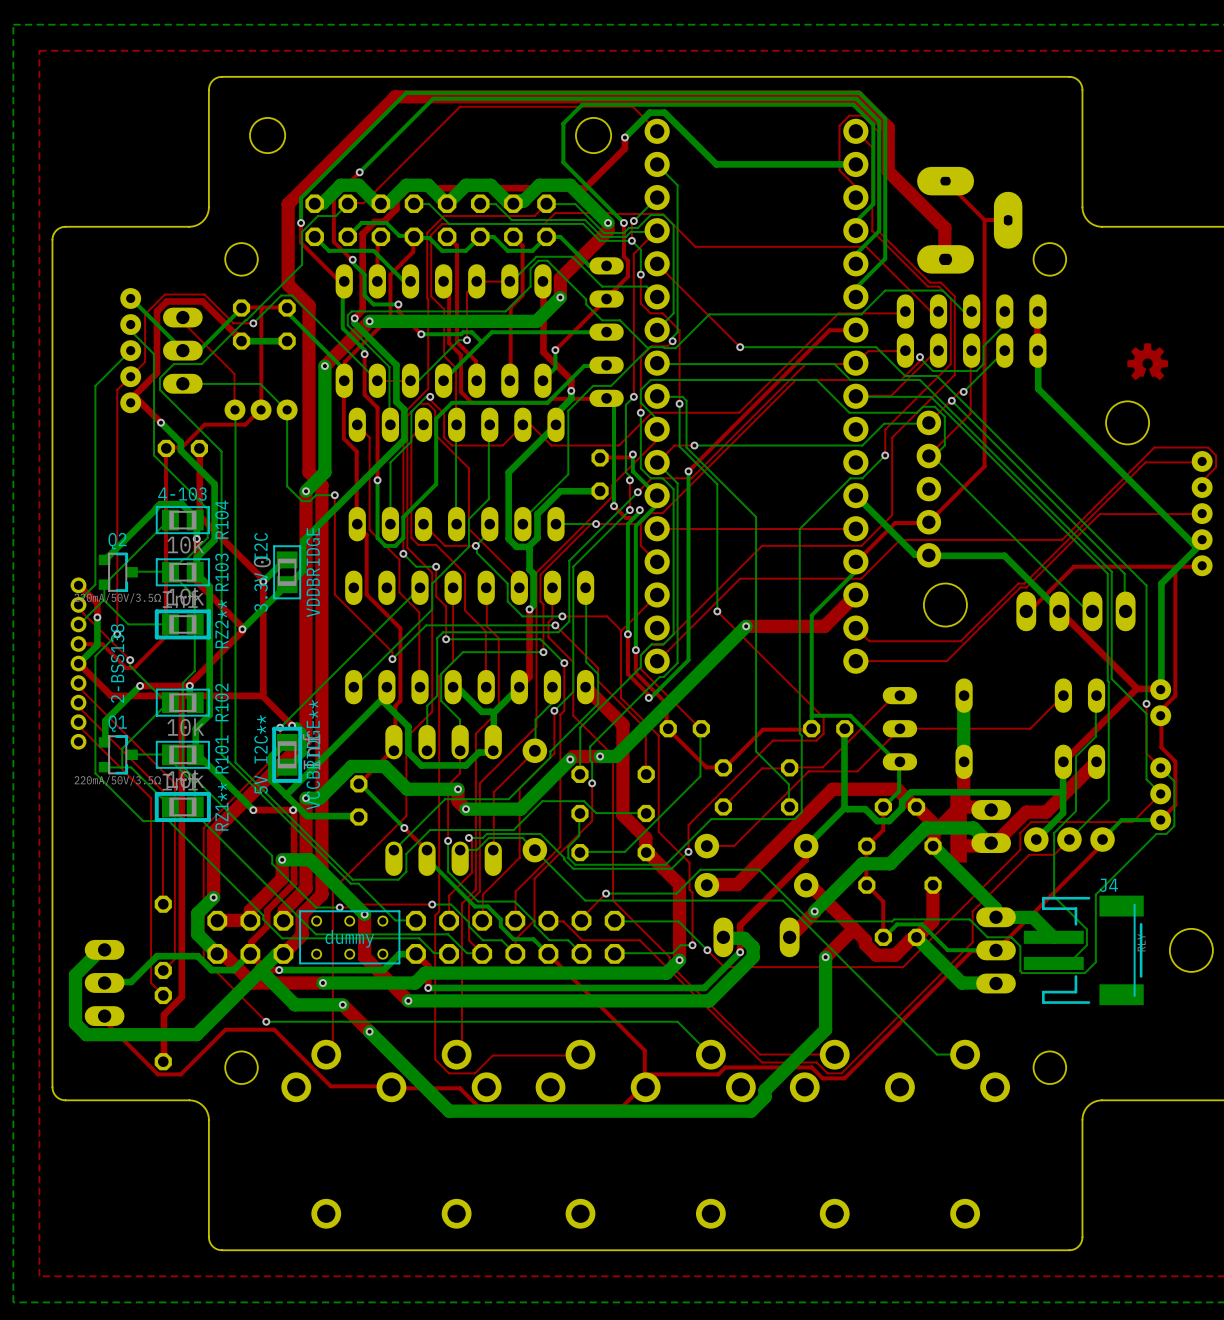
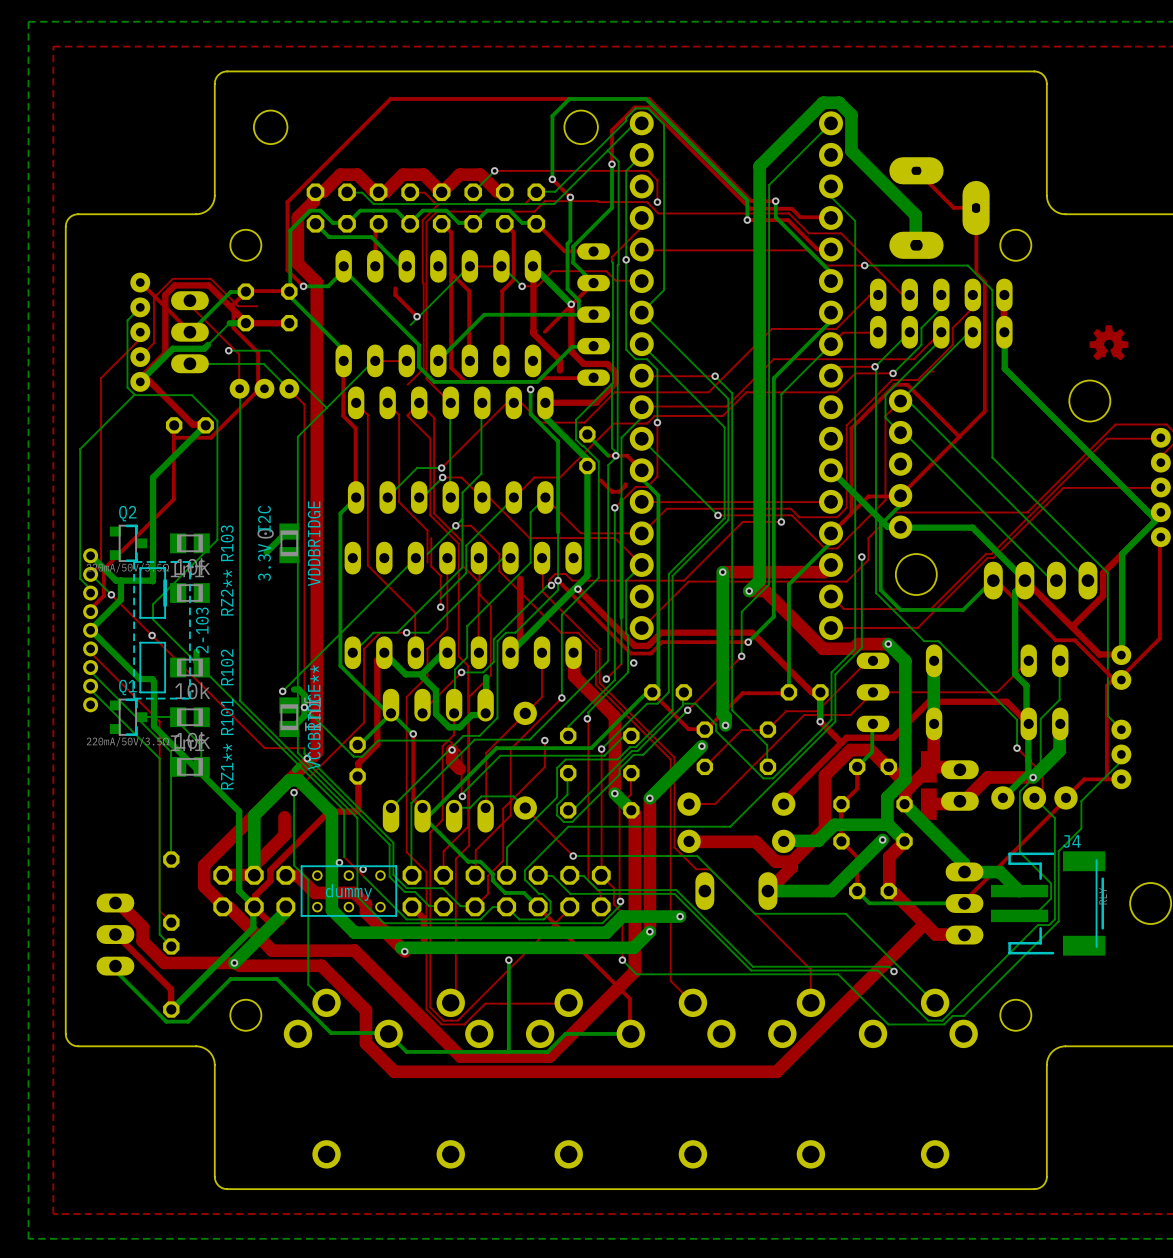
bottom track: (581, 105) (853, 104) (873, 124) (873, 204) (856, 221) (855, 230) -> (569, 98) (646, 98) (747, 200) (747, 220)
top track: (657, 131) (632, 106) (460, 106) (363, 203) (347, 203) -> none
bottom track: none -> (831, 123) (769, 185) (769, 584) (741, 611) (741, 656)
top track: (855, 131) (872, 147) (872, 230) (927, 286) (938, 286) (950, 298) (950, 364) (885, 429) (885, 455) -> none
bottom track: (624, 137) (649, 112) (664, 112) (716, 164) (855, 164) -> none
top track: (624, 137) (624, 148) (585, 188) (408, 188) (396, 200) (396, 209) (383, 221) (374, 221) (362, 233) (362, 310) (354, 318) -> none
via: (624, 137) -> none
bottom track: (563, 162) (623, 222) -> (552, 152) (552, 179)
bottom track: (657, 164) (677, 185) (677, 332) (672, 337) (672, 341) -> (641, 154) (626, 170) (626, 236)
bottom track: (359, 172) (433, 98) (856, 98) (879, 121) (879, 230) (856, 253) (855, 263) -> none
top track: (359, 172) (333, 198) (333, 241) (352, 259) -> none
via: (359, 172) -> none
bottom track: none -> (612, 164) (612, 207) (573, 246) (573, 262) (593, 283)
top track: none -> (612, 164) (612, 130) (634, 107) (648, 107) (750, 208) (791, 208) (800, 217) (831, 217)
via: none -> (612, 164)
top track: none -> (494, 170) (647, 170) (657, 180) (657, 202)
via: none -> (494, 170)
top track: none -> (552, 179) (570, 197)
via: none -> (552, 179)
bottom track: (657, 197) (633, 221) -> none
top track: (855, 197) (855, 186) (839, 170) (839, 125) (849, 115) (862, 115) (878, 131) (878, 230) (929, 282) (940, 282) (954, 296) (954, 374) (892, 437) (892, 515) (872, 534) -> (972, 294) (972, 308) (952, 327) (952, 345) (917, 380) (892, 380) (846, 425) (846, 507)
bottom track: (314, 203) (322, 203) (340, 185) (358, 185) (374, 201) (380, 203) (388, 203) (406, 185) (428, 185) (447, 203) (465, 185) (490, 185) (508, 203) (513, 203) (523, 201) (539, 185) (570, 185) (608, 222) -> none
bottom track: (347, 203) (335, 216) (317, 216) (302, 231) (302, 264) (224, 341) -> (347, 192) (362, 192) (373, 204) (554, 204) (634, 123) (641, 123)
bottom track: (414, 203) (429, 204) (449, 223) (583, 223) (600, 240) (631, 240) (640, 249) -> none
top track: none -> (410, 192) (424, 192) (435, 204) (438, 204)
bottom track: (480, 203) (495, 204) (511, 220) (585, 220) (602, 236) (625, 236) (630, 231) (657, 230) -> (473, 192) (494, 170)
top track: none -> (504, 192) (497, 191) (480, 174) (459, 174) (441, 192) (423, 174) (402, 174) (385, 191) (378, 192) (372, 189) (357, 174) (340, 174) (323, 191) (315, 191) (313, 201) (297, 217) (297, 263) (316, 282) (316, 752) (204, 865) (204, 886) (222, 906)
bottom track: (546, 203) (575, 204) (604, 232) (623, 232) (628, 227) (637, 227) (650, 215) (663, 215) (673, 224) (673, 313) -> (536, 192) (555, 191) (626, 120) (626, 117) (635, 108) (647, 108) (664, 124) (664, 290) (657, 296)
bottom track: none -> (570, 197) (567, 289) (578, 300) (578, 313) (593, 314)
via: none -> (570, 197)
top track: none -> (775, 201) (751, 201) (648, 98) (390, 98) (287, 202) (287, 270) (303, 286)
via: none -> (775, 201)
via: none -> (657, 202)
top track: (984, 220) (984, 466) -> (976, 208) (976, 273) (984, 281) (984, 411) (953, 442)
top track: (633, 221) (631, 222) (631, 240) -> none
via: (633, 221) -> none
bottom track: (301, 222) (301, 198) (406, 92) (859, 92) (885, 118) (885, 258) (856, 287) (855, 296) -> (775, 201) (775, 217) (830, 272) (831, 281)
top track: (301, 222) (301, 242) (338, 280) (344, 281) -> none
via: (301, 222) -> none
bottom track: (386, 222) (399, 235) (429, 237) (442, 250) (465, 250) (480, 236) (493, 236) (507, 250) (532, 250) (546, 236) (560, 236) (589, 265) (606, 265) -> (383, 210) (396, 210) (410, 223) (422, 210) (446, 210) (458, 222) (473, 223) (487, 210) (509, 210) (522, 222) (536, 223)
top track: (608, 222) (608, 230) (560, 278) (560, 297) -> none
via: (608, 222) -> none
top track: (623, 222) (623, 256) (627, 260) (627, 276) (606, 299) -> none
via: (623, 222) -> none
top track: (674, 225) (695, 246) (832, 246) -> (658, 213) (788, 213) (808, 233)
top track: (656, 230) (633, 253) (633, 396) -> (641, 218) (641, 227) (612, 257) (612, 261)
top track: none -> (747, 220) (788, 220) (817, 249) (831, 249)
via: none -> (747, 220)
bottom track: none -> (347, 223) (332, 222) (320, 210) (310, 210) (290, 230) (289, 291)
top track: (414, 236) (413, 251) (390, 274) (390, 316) (344, 362) (344, 380) -> none
top track: none -> (536, 223) (564, 251) (593, 251)
via: (631, 240) -> none
bottom track: (352, 259) (352, 262) (364, 274) (364, 295) (373, 304) (398, 304) -> none
via: (352, 259) -> none
bottom track: none -> (916, 245) (915, 215) (851, 151) (851, 115) (839, 102) (823, 102) (759, 166) (759, 580) (749, 591)
top track: (945, 259) (944, 227) (888, 171) (888, 127) (857, 96) (395, 96) (288, 204) (288, 284) (309, 305) (309, 472) (321, 485) (321, 894) (302, 914) (302, 935) (283, 953) -> none
top track: (657, 264) (740, 347) -> (642, 250) (810, 250) (825, 265) (864, 265)
bottom track: none -> (626, 259) (626, 349) (635, 359) (647, 359) (657, 369) (657, 422)
top track: (640, 274) (640, 303) (650, 313) (662, 313) (679, 330) (679, 403) -> none
via: none -> (864, 265)
bottom track: (344, 281) (342, 328) (364, 350) (364, 354) -> none
top track: (444, 281) (449, 286) (449, 343) (461, 355) (461, 391) -> none
bottom track: none -> (469, 266) (410, 325)
top track: (476, 281) (466, 292) (466, 340) -> none
bottom track: (509, 281) (536, 256) (572, 256) (602, 286) (646, 286) (657, 296) -> (501, 266) (522, 286)
bottom track: none -> (532, 266) (571, 304)
top track: none -> (451, 273) (469, 291) (469, 342)
top track: (431, 296) (444, 309) (444, 356) (456, 368) (456, 424) -> (426, 280) (426, 379) (450, 402)
top track: none -> (641, 281) (615, 280) (606, 271) (552, 271) (537, 286) (522, 286)
bottom track: (560, 297) (536, 321) (369, 321) -> none
via: (560, 297) -> none
bottom track: (130, 298) (182, 350) (199, 350) (241, 308) -> (189, 332) (230, 292) (245, 292)
top track: none -> (140, 282) (189, 332)
via: none -> (303, 286)
via: none -> (522, 286)
via: (398, 304) -> none
top track: (261, 307) (261, 409) (245, 424) (204, 424) (181, 447) (166, 448) -> none
top track: none -> (245, 291) (233, 304) (233, 327) (258, 352) (258, 388) (264, 388) (259, 389) (210, 437) (173, 437)
bottom track: (971, 311) (963, 311) (942, 290) (885, 290) (861, 314) (709, 314) (675, 348) (649, 347) (611, 385) (593, 385) (568, 410) (568, 474) (523, 519) (522, 524) -> (941, 294) (940, 309) (921, 327) (921, 345) (893, 373)
bottom track: (1004, 311) (1004, 325) (983, 346) (983, 364) (976, 371) (932, 371) (920, 357) -> none
top track: (905, 312) (838, 313) (739, 412) (651, 412) (618, 445) (597, 445) -> (877, 295) (869, 295) (836, 328) (771, 328) (708, 392) (614, 392) (584, 422)
bottom track: (354, 318) (354, 323) (396, 365) (396, 401) (404, 409) (404, 439) (303, 540) (303, 570) (242, 629) -> none
via: (354, 318) -> none
top track: (369, 321) (324, 366) -> none
via: (369, 321) -> none
top track: none -> (571, 304) (571, 351) (583, 363) (607, 363) (615, 372) (615, 382) (595, 402) (545, 402)
via: none -> (571, 304)
bottom track: (253, 323) (281, 295) (292, 295) (376, 379) -> none
via: (253, 323) -> none
bottom track: (130, 324) (131, 331) (154, 354) (154, 455) (207, 509) (207, 537) (170, 572) -> (140, 307) (127, 320) (127, 387) (135, 395) (191, 395) (217, 420) (217, 539) (153, 604) (153, 619) (344, 810) (344, 856)
bottom track: none -> (641, 312) (728, 398) (728, 520) (672, 575) (672, 710) (635, 747) (629, 747) (617, 759) (565, 759) (557, 768) (557, 797) (506, 847) (506, 875)
bottom track: none -> (831, 312) (830, 321) (773, 378) (773, 616) (748, 642)
top track: (855, 330) (829, 330) (688, 471) -> none
bottom track: (421, 334) (461, 334) (463, 332) (471, 332) (481, 342) -> none
bottom track: (466, 340) (459, 340) (419, 379) (410, 380) -> none
via: (466, 340) -> none
bottom track: (287, 341) (241, 341) -> (229, 323) (245, 323)
top track: none -> (289, 323) (245, 323)
top track: (672, 341) (667, 346) (651, 346) (640, 357) (640, 412) -> none
via: (672, 341) -> none
top track: (457, 342) (475, 361) -> (451, 324) (451, 367) (454, 371)
bottom track: (740, 347) (876, 347) (905, 375) (936, 375) (1146, 585) (1146, 603) -> (864, 265) (967, 265) (992, 290) (992, 457) (1107, 573)
via: (740, 347) -> none
bottom track: (648, 348) (619, 320) (602, 320) (586, 304) (586, 299) (547, 260) (538, 260) (530, 268) (530, 286) (505, 311) (351, 311) (347, 315) (347, 325) (389, 367) (390, 424) -> none
bottom track: (130, 350) (95, 385) (95, 584) (79, 600) (78, 604) -> (111, 594) (90, 574)
bottom track: (555, 350) (555, 368) (542, 380) -> none
via: (555, 350) -> none
bottom track: none -> (909, 332) (875, 366) (876, 592) (924, 641) (938, 641) (1017, 719) (1017, 748)
top track: (938, 350) (891, 395) (856, 395) -> (875, 366) (840, 366) (831, 375)
bottom track: none -> (941, 332) (940, 340) (894, 385)
top track: (970, 351) (970, 413) (928, 455) -> (940, 332) (913, 359) (773, 359) (726, 406) (641, 407)
bottom track: (1004, 351) (963, 391) -> (972, 332) (968, 332) (900, 400)
top track: (364, 354) (364, 394) (377, 407) (377, 480) -> none
via: (364, 354) -> none
top track: (920, 357) (920, 361) (901, 379) (795, 379) (673, 502) -> (657, 422) (657, 476)
via: (920, 357) -> none
bottom track: none -> (831, 344) (781, 394) (781, 521)
top track: (855, 363) (805, 364) (691, 478) (651, 478) (637, 492) -> none
bottom track: (201, 364) (173, 364) (159, 377) (159, 389) (221, 451) (221, 754) (350, 883) (358, 883) (395, 920) (415, 920) -> (411, 803) (411, 874)
bottom track: none -> (207, 345) (204, 348) (172, 348) (140, 381)
bottom track: (657, 364) (834, 364) (850, 379) (920, 379) (1111, 571) (1111, 679) (1146, 713) -> (642, 345) (724, 427) (724, 518) (668, 574) (668, 692) (657, 703) (647, 703) (601, 749)
bottom track: (324, 366) (324, 472) (306, 491) -> none
via: (324, 366) -> none
bottom track: none -> (228, 350) (269, 350) (326, 407)
via: none -> (228, 350)
top track: (130, 376) (117, 389) (117, 634) -> none
via: none -> (875, 366)
bottom track: (571, 390) (571, 398) (556, 413) (555, 425) (508, 472) (508, 538) (516, 546) (528, 546) -> none
via: (571, 390) -> none
via: (963, 391) -> none
top track: none -> (893, 373) (855, 373) (836, 392) (746, 392) (722, 415) (654, 415) (647, 423) (613, 423) (559, 477) (534, 477) (513, 497)
via: none -> (893, 373)
bottom track: (430, 396) (426, 396) (411, 411) (411, 441) (390, 462) (390, 524) -> (441, 468) (417, 468) (387, 497)
top track: (430, 396) (430, 399) (444, 413) (444, 437) (452, 445) (502, 445) (522, 425) -> (441, 468) (506, 403) (513, 403)
via: (430, 396) -> none
bottom track: (633, 396) (626, 403) -> (612, 261) (612, 382)
via: (633, 396) -> none
bottom track: (657, 396) (682, 396) (686, 400) (686, 447) (756, 517) (756, 751) -> (715, 376) (732, 393) (732, 710) (735, 714)
top track: none -> (641, 375) (715, 376)
via: none -> (715, 376)
bottom track: (855, 396) (930, 396) (1107, 573) (1108, 800) (1069, 839) -> none
bottom track: (606, 398) (614, 405) (614, 506) -> none
bottom track: (951, 400) (1124, 573) (1124, 610) -> (900, 401) (904, 397) (1087, 579)
via: (951, 400) -> none
bottom track: (452, 402) (436, 418) (436, 484) (403, 517) (403, 537) (395, 545) (385, 545) (377, 537) (377, 480) -> (446, 381) (434, 381) (418, 366) (418, 345) (344, 270) (344, 266) (343, 271) (328, 286) (303, 286)
bottom track: (679, 403) (679, 446) (717, 484) (717, 611) -> none
via: (679, 403) -> none
top track: (411, 405) (403, 413) (403, 553) -> none
bottom track: (922, 406) (934, 406) (944, 416) (944, 445) (933, 456) (928, 455) -> (889, 391) (885, 395) (885, 417) (900, 432)
bottom track: (287, 409) (287, 486) (302, 501) (310, 501) (315, 495) (334, 495) -> none
top track: none -> (289, 388) (304, 404) (304, 707)
via: none -> (530, 389)
bottom track: (640, 412) (640, 468) (650, 478) (662, 478) (673, 489) (673, 634) (663, 644) (651, 644) (640, 655) -> (641, 564) (626, 580) (626, 622)
via: (640, 412) -> none
bottom track: (917, 412) (849, 412) (816, 379) (650, 379) (640, 389) (640, 402) (656, 418) (657, 429) -> none
bottom track: (160, 422) (180, 442) (180, 450) (214, 484) (214, 539) (196, 557) (195, 572) (209, 586) (209, 714) (195, 728) (195, 754) (198, 755) (253, 810) -> none
via: (160, 422) -> none
bottom track: (928, 422) (884, 423) (862, 445) (694, 445) -> none
bottom track: none -> (545, 402) (545, 417) (586, 458) (587, 575) (510, 652)
top track: (657, 429) (656, 440) (612, 485) (612, 497) (536, 572) (536, 726) (479, 783) (479, 891) (468, 902) (468, 940) (482, 953) -> (544, 740) (544, 767) (503, 808) (503, 860) (488, 875) (488, 893) (475, 906)
top track: (411, 438) (411, 537) -> (387, 402) (399, 415) (399, 502) (407, 510)
top track: none -> (407, 415) (430, 438) (430, 515) (458, 544)
via: none -> (657, 422)
top track: (694, 445) (674, 445) (657, 462) -> none
via: (694, 445) -> none
bottom track: none -> (205, 425) (153, 477) (152, 581) (116, 580) (90, 555)
top track: (199, 448) (199, 516) (263, 581) (262, 695) -> (205, 425) (192, 424) (169, 400)
bottom track: (632, 454) (632, 471) (657, 495) (656, 505) (635, 526) -> (641, 407) (641, 417) (621, 437) (621, 499)
top track: (632, 454) (629, 457) (600, 457) -> none
via: (632, 454) -> none
bottom track: (885, 455) (862, 478) (850, 478) (799, 528) (801, 812) -> (831, 186) (831, 197) (855, 221) (855, 648) (831, 672) (831, 719) (779, 771)
via: (885, 455) -> none
bottom track: none -> (587, 434) (608, 455)
top track: none -> (959, 436) (907, 384) (894, 384) (851, 428) (851, 513)
bottom track: (688, 471) (688, 660) (648, 697) -> none
via: (688, 471) -> none
via: (377, 480) -> none
top track: none -> (608, 455) (627, 455) (641, 470)
top track: (629, 480) (629, 510) -> none
bottom track: (677, 483) (677, 663) (663, 677) (659, 677) (590, 746) (592, 783) -> (661, 458) (717, 515)
top track: (306, 491) (306, 739) (213, 832) (213, 897) -> none
via: (306, 491) -> none
bottom track: (600, 491) (560, 491) (537, 514) (537, 537) (528, 546) -> none
bottom track: (637, 492) (569, 560) -> (530, 389) (530, 414) (558, 441) (558, 532)
via: (637, 492) -> none
via: none -> (441, 468)
text: 4-103 (182, 494) -> none
top track: (334, 495) (334, 594) (392, 652) (392, 659) -> none
via: (334, 495) -> none
bottom track: none -> (641, 470) (642, 479) (658, 495) (658, 686) (652, 692) (646, 693) (591, 748) (496, 748) (429, 815) (422, 807)
bottom track: none -> (442, 477) (422, 497) (419, 497)
top track: none -> (442, 477) (461, 477) (482, 498) (489, 498) (529, 538) (614, 538) (641, 564)
via: none -> (442, 477)
via: (614, 506) -> none
line: (208, 507) (156, 507) (156, 533) (208, 533) (208, 507) -> none
bottom track: (629, 510) (573, 566) (573, 647) -> (612, 383) (576, 419) (576, 439) (598, 461) (598, 577) (561, 614)
via: (629, 510) -> none
bottom track: (639, 510) (627, 524) (627, 634) -> none
via: (639, 510) -> none
bottom track: (170, 520) (104, 584) (104, 599) (78, 624) -> (134, 394) (80, 449) (80, 578) (90, 589) (90, 592)
R104: 10k (182, 520) -> none
bottom track: none -> (900, 495) (899, 505) (880, 524) (880, 590) (900, 609) (963, 609) (993, 580)
top track: (640, 523) (640, 545) (656, 561) -> (626, 496) (614, 507)
bottom track: none -> (356, 497) (340, 513) (340, 665) (388, 714) (391, 713)
top track: (357, 524) (366, 534) (366, 594) (400, 628) (400, 700) (395, 705) (395, 749) (358, 783) -> none
top track: (423, 524) (445, 545) (475, 545) -> none
bottom track: (489, 524) (488, 532) (475, 545) (476, 552) (507, 583) (507, 601) (522, 616) (562, 616) -> none
bottom track: none -> (513, 497) (466, 545) (466, 573) (440, 598)
top track: none -> (545, 497) (580, 533) (641, 533)
bottom track: (596, 524) (555, 524) -> none
via: (596, 524) -> none
top track: (640, 524) (591, 524) (540, 574) (540, 601) (543, 604) (543, 652) -> none
top track: (165, 526) (165, 636) (134, 668) (126, 668) (102, 644) (78, 643) -> (173, 499) (103, 569) (103, 595) (91, 608) (90, 611)
top track: (369, 529) (399, 559) (399, 592) (419, 612) (419, 645) -> (367, 503) (367, 565) (415, 612)
bottom track: none -> (614, 507) (614, 680) (568, 726)
via: none -> (614, 507)
bottom track: (196, 538) (194, 517) (181, 504) (159, 504) (104, 559) -> none
top track: (196, 538) (196, 581) (241, 626) (242, 631) (189, 685) (140, 685) -> none
via: (196, 538) -> none
top track: (921, 539) (900, 539) -> (900, 401) (885, 415) (885, 500) (873, 512)
top track: none -> (1160, 512) (1159, 516) (1103, 573) (1103, 595) (1071, 627)
top track: none -> (717, 515) (791, 515) (824, 548) (837, 548)
via: none -> (717, 515)
top track: (418, 544) (436, 544) (464, 573) -> (414, 517) (427, 530) (427, 543)
top track: (862, 544) (762, 545) (662, 645) (650, 645) (640, 655) (640, 669) (701, 728) -> (837, 517) (799, 517) (790, 508) (666, 508) (641, 533)
via: (475, 545) -> none
line: (300, 546) (274, 546) (274, 598) (300, 598) (300, 546) -> none
bottom track: (528, 546) (529, 569) (533, 573) (533, 605) (529, 609) -> none
top track: none -> (781, 521) (742, 521) (683, 580) (572, 580) (565, 574) (555, 574) (549, 579) (549, 586)
via: none -> (781, 521)
bottom track: (403, 553) (416, 566) (436, 566) -> none
via: (403, 553) -> none
top track: none -> (455, 525) (471, 525) (499, 554) (499, 571) (560, 632) (577, 632) (595, 650) (595, 684) (670, 759) (670, 980) (692, 1002)
via: none -> (455, 525)
line: (208, 559) (208, 585) (156, 585) (156, 559) (208, 559) -> none
via: (436, 566) -> none
top track: (1175, 566) (1175, 695) (1161, 709) (1160, 715) (1161, 747) (1175, 761) (1175, 805) (1160, 820) -> none
top track: (1201, 566) (1074, 566) (1030, 610) (1026, 611) -> (1121, 679) (1113, 679) (1074, 640) (1055, 640) (996, 580) (993, 580)
top track: none -> (1159, 538) (1159, 638) (1121, 677) (1121, 679)
bottom track: (170, 572) (132, 572) -> none
bottom track: (170, 572) (194, 596) (194, 671) (182, 682) (182, 766) (272, 855) (272, 863) (315, 907) (339, 907) -> none
top track: (432, 572) (407, 547) (407, 415) (419, 403) (428, 403) (435, 410) (435, 434) (468, 468) (468, 528) (518, 578) (519, 587) -> none
top track: (862, 577) (740, 578) (706, 612) -> (894, 512) (868, 538) (868, 559) (846, 581) (688, 581)
via: (263, 581) -> none
bottom track: (432, 583) (432, 609) (375, 666) -> (462, 519) (462, 567) (397, 632) (373, 632)
top track: (78, 585) (97, 603) (97, 617) -> none
bottom track: none -> (861, 556) (861, 647) (835, 674) (835, 721) (730, 826)
via: none -> (861, 556)
bottom track: none -> (510, 558) (502, 558) (428, 632) (406, 632)
top track: (552, 587) (552, 618) (548, 622) (548, 637) (573, 662) (573, 715) (613, 755) (613, 900) (669, 957) (669, 964) (760, 1054) (834, 1054) -> (542, 558) (542, 592) (544, 593)
bottom track: (585, 587) (586, 662) (598, 674) (598, 703) (550, 751) (550, 757) (508, 799) (445, 799) -> none
line: none -> (189, 561) (134, 561) (134, 698) (189, 698) (189, 561)
top track: (432, 592) (432, 682) -> (434, 642) (427, 648)
top track: (657, 594) (620, 631) (620, 697) (658, 735) (658, 832) (689, 862) (689, 889) (691, 891) -> (585, 634) (599, 648) (599, 682) (674, 757) (674, 847)
bottom track: (103, 600) (128, 624) (170, 624) -> none
bottom track: none -> (722, 572) (722, 714) (725, 716) (725, 725)
via: none -> (722, 572)
top track: (848, 602) (824, 626) (746, 626) -> (823, 572) (722, 572)
top track: (78, 604) (79, 609) (130, 660) -> (90, 574) (100, 564) (100, 378) (139, 339) (140, 332)
via: (529, 609) -> none
top track: (464, 610) (485, 631) -> (419, 402) (434, 417) (434, 513) (462, 541) (462, 565) (478, 581) (478, 599)
bottom track: none -> (120, 580) (120, 599) (90, 630) (139, 679) (152, 679) (153, 726) (239, 811) (239, 891) (254, 906)
line: (156, 611) (208, 611) (208, 637) (156, 637) -> (165, 580) (165, 568) (140, 568) (140, 617) (165, 617) (165, 605)
top track: none -> (558, 580) (630, 653) (650, 653) (662, 642) (748, 642)
via: none -> (558, 580)
top track: (717, 611) (823, 717) (823, 733) (816, 740) (772, 740) (688, 825) (688, 851) -> none
via: (717, 611) -> none
bottom track: none -> (1024, 580) (1015, 592) (1015, 674) (1026, 685) (1026, 721) (1028, 723)
top track: (562, 616) (607, 616) (621, 630) -> none
bottom track: (97, 617) (97, 645) (78, 663) -> none
via: (97, 617) -> none
bottom track: none -> (549, 586) (546, 586) (493, 639) (493, 662) (483, 672) (461, 672)
top track: none -> (577, 589) (634, 645) (647, 645) (661, 632) (752, 632) (811, 692) (820, 692)
via: none -> (577, 589)
top track: none -> (749, 591) (765, 591) (823, 648) (853, 648) (858, 644) (888, 644)
via: none -> (749, 591)
bottom track: (555, 625) (426, 625) (392, 659) -> none
via: (555, 625) -> none
top track: none -> (111, 594) (264, 748) (304, 748)
via: none -> (111, 594)
bottom track: (746, 626) (616, 756) (600, 756) -> none
via: (746, 626) -> none
via: (242, 629) -> none
bottom track: (558, 632) (443, 632) (437, 638) (437, 695) (427, 705) (427, 750) -> (547, 600) (515, 632) (506, 632) (497, 641) (497, 717) (479, 735) (463, 735) (439, 759)
bottom track: (117, 634) (95, 656) (95, 773) (143, 821) (168, 821) (263, 915) (263, 919) (282, 938) (408, 938) -> (374, 360) (297, 436) (297, 752) (389, 844) (389, 876) (404, 891)
via: (117, 634) -> none
top track: (627, 634) (627, 674) (648, 694) (648, 697) -> none
via: (627, 634) -> none
bottom track: (446, 639) (540, 639) (564, 663) -> none
top track: (635, 650) (635, 673) (666, 703) (666, 727) (668, 728) -> none
via: (635, 650) -> none
bottom track: (543, 652) (463, 652) (441, 674) (441, 700) (460, 719) (460, 750) -> (545, 497) (530, 512) (530, 562) (467, 626) (467, 657) (454, 669) (454, 713)
via: (543, 652) -> none
via position: (392, 659) -> (406, 632)
bottom track: (130, 660) (130, 666) (166, 702) (170, 702) (167, 702) (122, 748) (122, 767) -> none
via: (130, 660) -> none
top track: (78, 663) (111, 695) (262, 695) -> none
text: 2-BSS138 (117, 663) -> none
text: none -> 2-103 (202, 630)
top track: (564, 663) (564, 710) (560, 714) (560, 846) (515, 891) (515, 920) -> none
via: (564, 663) -> none
top track: none -> (406, 632) (380, 632) (364, 648) (364, 722) (294, 792)
bottom track: (640, 667) (580, 727) (580, 764) -> (626, 633) (628, 635) (628, 672) (588, 712) (588, 715)
top track: (598, 668) (598, 680) (645, 728) (646, 774) -> none
via: none -> (152, 635)
top track: (439, 676) (439, 911) (435, 915) -> (442, 799) (442, 820) (430, 832) (430, 870)
via: none -> (748, 642)
via: none -> (888, 644)
bottom track: (140, 685) (105, 720) (104, 742) -> none
via: (140, 685) -> none
via: (189, 685) -> none
bottom track: none -> (384, 652) (405, 674) (421, 674)
bottom track: (519, 687) (493, 712) (481, 711) (458, 687) (453, 687) -> (421, 674) (442, 653) (447, 652)
bottom track: (552, 687) (552, 702) (535, 719) (534, 750) -> none
top track: none -> (542, 652) (541, 697) (525, 713)
top track: (586, 687) (622, 724) (622, 815) (645, 837) (646, 852) (679, 884) (679, 960) -> (574, 653) (574, 676) (614, 716) (614, 793)
top track: (1137, 688) (1063, 761) -> (783, 804) (784, 800) (846, 737) (893, 737) (929, 701) (1006, 701) (1028, 723)
line: (156, 689) (208, 689) (208, 715) (156, 715) -> (165, 655) (165, 642) (140, 642) (140, 692) (165, 692) (165, 679)
top track: none -> (741, 656) (687, 710)
via: none -> (741, 656)
bottom track: (573, 691) (554, 710) -> (561, 657) (561, 697)
top track: (181, 695) (181, 996) (163, 1014) (163, 1061) -> (115, 934) (171, 989) (171, 1009)
top track: (262, 695) (292, 725) -> none
top track: none -> (621, 663) (606, 679)
bottom track: none -> (90, 667) (91, 672) (171, 751) (171, 859)
top track: (78, 702) (79, 707) (162, 791) (163, 904) -> none
via: (1146, 703) -> none
top track: none -> (461, 672) (422, 713)
via: none -> (461, 672)
top track: (554, 710) (554, 753) -> (561, 697) (543, 715)
via: (554, 710) -> none
via: none -> (606, 679)
bottom track: (811, 715) (850, 715) (897, 762) (899, 761) -> none
top track: none -> (1121, 679) (1112, 680) (1106, 685) (1106, 779)
bottom track: none -> (90, 686) (91, 690) (159, 758) (159, 934) (171, 946)
top track: (78, 722) (79, 726) (151, 798) -> (159, 721) (159, 758)
via position: (292, 725) -> (304, 707)
top track: (280, 727) (280, 751) (203, 828) (203, 959) (266, 1021) -> none
line: (300, 728) (274, 728) (274, 780) (300, 780) (300, 728) -> none
top track: (410, 733) (406, 737) (406, 816) (332, 889) (332, 1048) (326, 1054) -> (406, 697) (406, 852) (426, 872) (426, 1009) (441, 1024) (464, 1024) (468, 1020)
via: none -> (561, 697)
bottom track: (235, 737) (235, 762) (352, 879) (398, 879) (406, 871) (406, 853) (415, 844) -> (240, 700) (357, 818) (357, 896) (383, 923) (602, 923) (620, 905) (620, 901)
bottom track: none -> (682, 703) (695, 703) (716, 724) (716, 731) (763, 778)
line: (208, 741) (208, 767) (156, 767) (156, 741) (208, 741) -> none
bottom track: (287, 742) (271, 756) (271, 780) (307, 816) (358, 817) -> none
bottom track: (700, 742) (700, 776) (624, 851) (585, 851) -> (682, 705) (637, 750) (631, 750) (573, 809)
bottom track: none -> (304, 707) (353, 756) (362, 756) (378, 740) (449, 740)
via: none -> (687, 710)
top track: (841, 748) (822, 767) (789, 767) -> (817, 711) (786, 711) (768, 729)
bottom track: none -> (391, 713) (413, 733)
top track: (876, 752) (857, 771) (808, 771) -> (850, 715) (804, 715) (786, 733)
top track: none -> (588, 715) (588, 880) (600, 892) (601, 906)
bottom track: (1146, 753) (1146, 779) (1160, 793) -> (1107, 715) (1121, 729)
text: 5V I2C** (261, 754) -> none
top track: (600, 756) (573, 756) (570, 759) -> none
top track: (151, 759) (174, 783) (174, 959) (163, 970) -> none
bottom track: (570, 759) (520, 809) (465, 809) -> none
via: (570, 759) -> none
bottom track: (844, 759) (844, 808) -> (621, 617) (621, 663)
top track: none -> (820, 721) (841, 742)
via: none -> (820, 721)
bottom track: none -> (1060, 723) (1059, 750) (1033, 777)
top track: (1096, 761) (1046, 812) (1026, 812) (1020, 818) -> (1033, 777) (987, 777)
via: none -> (725, 725)
bottom track: (455, 765) (421, 765) (408, 752) (408, 726) (383, 701) (386, 687) (386, 694) (286, 795) -> (449, 727) (435, 714) (435, 690) (421, 674)
bottom track: (104, 767) (131, 767) (184, 821) (202, 821) (292, 910) -> (294, 792) (294, 865)
bottom track: (1160, 767) (1174, 781) (1174, 826) (1166, 833) (1156, 833) (1118, 871) -> (1121, 754) (1121, 761) (1081, 801) (1081, 828)
via: none -> (413, 733)
bottom track: none -> (631, 735) (624, 735) (604, 755) (500, 755) (461, 794)
top track: none -> (449, 740) (461, 752) (461, 794)
via: none -> (544, 740)
bottom track: (359, 783) (404, 828) -> (358, 744) (391, 713)
top track: (592, 783) (592, 821) (534, 878) (534, 920) (515, 939) (515, 953) -> none
via: (592, 783) -> none
bottom track: none -> (701, 746) (649, 798)
via: none -> (701, 746)
via: none -> (1017, 748)
top track: none -> (601, 749) (601, 875) (613, 888) (613, 904) (622, 912) (622, 960)
via: none -> (601, 749)
bottom track: (458, 789) (407, 789) (384, 766) (351, 766) (319, 798) (306, 798) -> none
top track: (876, 789) (832, 789) (737, 884) (706, 885) -> (850, 750) (824, 775) (824, 828) (791, 861) (775, 861) (755, 841) (689, 841)
bottom track: (1063, 792) (911, 792) (902, 801) (902, 808) (889, 821) (877, 821) (865, 809) (844, 808) -> none
line: (208, 793) (208, 820) (156, 820) (156, 793) (208, 793) -> none
top track: (1160, 793) (1132, 822) (1031, 822) (1020, 832) (1020, 849) (903, 967) (724, 967) (707, 950) -> none
top track: (306, 798) (306, 888) (284, 910) (283, 920) -> none
bottom track: (844, 808) (806, 846) -> none
via: (465, 809) -> none
top track: (253, 810) (294, 811) (294, 883) (267, 910) (267, 915) -> (384, 652) (377, 660) (377, 744) (358, 763) (358, 810) (329, 811) (270, 870)
via: (253, 810) -> none
via: (293, 810) -> none
bottom track: (646, 813) (596, 813) (584, 801) (542, 801) (513, 830) (430, 830) -> (607, 150) (618, 161) (617, 455) (608, 465) (608, 661) (529, 739) (474, 739) (425, 788)
top track: none -> (631, 773) (630, 794) (619, 805) (620, 901)
via: none -> (1033, 777)
bottom track: (784, 819) (711, 819) (665, 864) (584, 864) -> (687, 710) (643, 754) (633, 754) (619, 768) (619, 774) (572, 821)
bottom track: (1160, 820) (1121, 820) (1102, 839) -> none
top track: (404, 828) (417, 840) -> (413, 733) (413, 799)
via: (404, 828) -> none
bottom track: (925, 828) (973, 828) (988, 842) (991, 843) -> (897, 786) (905, 779) (905, 661) (888, 644)
via: none -> (294, 792)
bottom track: none -> (614, 793) (631, 810)
via: none -> (614, 793)
bottom track: (468, 837) (482, 837) (486, 833) (540, 833) (573, 868) (671, 868) (688, 851) -> none
top track: (468, 837) (471, 840) (471, 872) -> (458, 579) (458, 656) (468, 665) (468, 826) (465, 829)
bottom track: (915, 838) (890, 863) (862, 863) (814, 911) -> (887, 797) (887, 824)
top track: none -> (649, 798) (649, 931)
top track: (1069, 839) (1054, 854) (1029, 854) (972, 911) (972, 942) (841, 1073) (827, 1073) (816, 1062) (762, 1062) (639, 940) (582, 940) (563, 921) (548, 920) -> (1034, 797) (1042, 789) (1042, 773) (1017, 748)
top track: (1102, 839) (1101, 844) (996, 950) -> (1121, 779) (1084, 779) (964, 900) (964, 903)
bottom track: (448, 840) (448, 871) (477, 901) (514, 901) (534, 921) -> none
via: (448, 840) -> none
top track: (806, 846) (805, 859) (740, 925) (740, 952) -> none
bottom track: (534, 850) (585, 900) -> none
top track: none -> (525, 807) (573, 856)
via position: (688, 851) -> (649, 798)
bottom track: (282, 859) (310, 859) (364, 914) -> none
via: (282, 859) -> none
bottom track: (700, 869) (676, 893) (606, 893) -> (682, 826) (568, 826) (524, 870) (524, 875)
bottom track: (750, 869) (759, 869) (810, 921) (969, 919) (987, 937) (1011, 937) (1020, 946) (1020, 971) (1022, 973) (1073, 973) -> (538, 875) (552, 875) (570, 893) (674, 893) (751, 970) (877, 970) (928, 1020) (942, 1020) (1037, 925)
bottom track: none -> (882, 839) (831, 891) (768, 891)
via: none -> (882, 839)
top track: (806, 885) (810, 885) (865, 940) (865, 944) (876, 955) (895, 955) (910, 940) (916, 937) -> (964, 935) (935, 934) (894, 893) (888, 891)
top track: (932, 885) (932, 921) (917, 937) -> (904, 841) (889, 856) (889, 891)
bottom track: none -> (904, 841) (888, 824) (834, 824) (818, 840) (783, 841)
top track: (692, 892) (692, 945) -> (675, 848) (696, 869) (710, 869) (810, 969) (810, 1002)
top track: (606, 893) (582, 917) (581, 920) -> none
via position: (606, 893) -> (573, 856)
bottom track: (1095, 894) (1095, 962) (1090, 967) -> (1034, 797) (1054, 818) (1054, 919)
bottom track: none -> (1059, 850) (1058, 921) (964, 1015) (952, 1015) (944, 1024) (888, 1024) (838, 974) (636, 974) (622, 960)
bottom track: (213, 897) (197, 913) (197, 934) (217, 953) -> none
via: (213, 897) -> none
bottom track: (715, 900) (782, 900) (936, 1054) (964, 1054) -> (697, 856) (754, 913) (845, 913) (934, 1002)
top track: none -> (344, 856) (364, 876)
bottom track: (432, 904) (451, 904) (482, 940) (501, 940) (515, 953) -> none
top track: (432, 904) (360, 904) (357, 907) (339, 907) -> none
via: (432, 904) -> none
via: (814, 911) -> none
top track: (364, 914) (364, 957) (367, 960) -> (285, 875) (297, 875) (314, 892) (354, 892) (365, 904) (365, 912)
bottom track: none -> (254, 875) (254, 815) (289, 780) (298, 780) (331, 813) (331, 909) (354, 932) (606, 932) (622, 916) (680, 916)
bottom track: (614, 920) (678, 921) (693, 936) -> (569, 875) (583, 875) (597, 890) (676, 890)
bottom track: (307, 925) (315, 934) (410, 934) -> (304, 748) (304, 753) (393, 842) (393, 874) (406, 888)
bottom track: none -> (308, 879) (308, 984) (326, 1002)
top track: (853, 928) (825, 957) -> none
bottom track: (723, 937) (744, 938) (753, 947) (753, 957) (709, 1000) (408, 1000) -> none
bottom track: (883, 937) (897, 924) (921, 924) (947, 950) -> (857, 891) (869, 903) (918, 903)
bottom track: (916, 937) (961, 983) (996, 983) -> none
bottom track: (553, 940) (568, 940) (581, 953) -> (542, 893) (550, 901) (550, 912) (543, 919) (519, 919) (506, 906) (492, 907) (480, 919) (406, 919) (364, 876)
bottom track: (692, 945) (680, 945) (672, 953) (614, 953) -> none
via: (692, 945) -> none
via: none -> (620, 901)
bottom track: (104, 949) (100, 950) (75, 975) (75, 1023) (86, 1034) (196, 1034) (277, 954) (283, 954) -> (234, 962) (285, 911) (285, 907)
top track: none -> (115, 903) (118, 903) (142, 927) (142, 941) (164, 962) (321, 965) (365, 1010) (365, 1043) (394, 1071) (776, 1071) (924, 923)
bottom track: none -> (689, 903) (753, 966) (889, 966) (894, 971)
via: (707, 950) -> none
top track: (996, 950) (971, 951) (844, 1078) (822, 1078) (811, 1067) (725, 1067) (718, 1074) (645, 1074) (645, 1087) (642, 1086) (622, 1106) (477, 1106) (460, 1088) (330, 1086) (274, 1029) (225, 1029) (180, 1074) (158, 1074) (105, 1021) (104, 1016) -> none
bottom track: (740, 952) (704, 987) (428, 987) -> none
via: (740, 952) -> none
bottom track: (415, 953) (399, 954) (383, 970) (279, 970) -> none
bottom track: (249, 954) (233, 970) (211, 970) (197, 956) (157, 956) (131, 982) (104, 982) -> (253, 907) (253, 927) (171, 1009)
bottom track: (825, 957) (825, 1029) (765, 1090) (765, 1097) (751, 1111) (449, 1111) (369, 1031) -> none
via: (825, 957) -> none
top track: (151, 958) (151, 983) (163, 995) -> (159, 910) (171, 922)
bottom track: (679, 960) (666, 973) (425, 973) (415, 983) (322, 983) -> none
via: (679, 960) -> none
via: none -> (680, 916)
bottom track: (260, 970) (295, 1004) (342, 1004) -> none
via: (279, 970) -> none
bottom track: none -> (649, 931) (633, 947) (400, 947)
via: none -> (649, 931)
top track: (322, 983) (252, 983) -> (631, 810) (634, 813) (634, 971) (549, 1056) (460, 1056) (354, 950) (272, 950) (256, 934)
via: (322, 983) -> none
via: (428, 987) -> none
top track: (342, 1004) (369, 1031) -> none
via: (342, 1004) -> none
bottom track: none -> (508, 960) (508, 1051)
via: none -> (508, 960)
via: none -> (622, 960)
via: none -> (234, 962)
bottom track: none -> (115, 966) (116, 971) (166, 1021) (188, 1021) (230, 979) (277, 979) (330, 1032) (387, 1032) (406, 1051) (547, 1051) (565, 1033) (630, 1033)
bottom track: (266, 1021) (677, 1021) (710, 1054) -> none
via: (266, 1021) -> none
via: none -> (894, 971)
via: (369, 1031) -> none
top track: (474, 1073) (463, 1073) -> (569, 906) (457, 1020)

